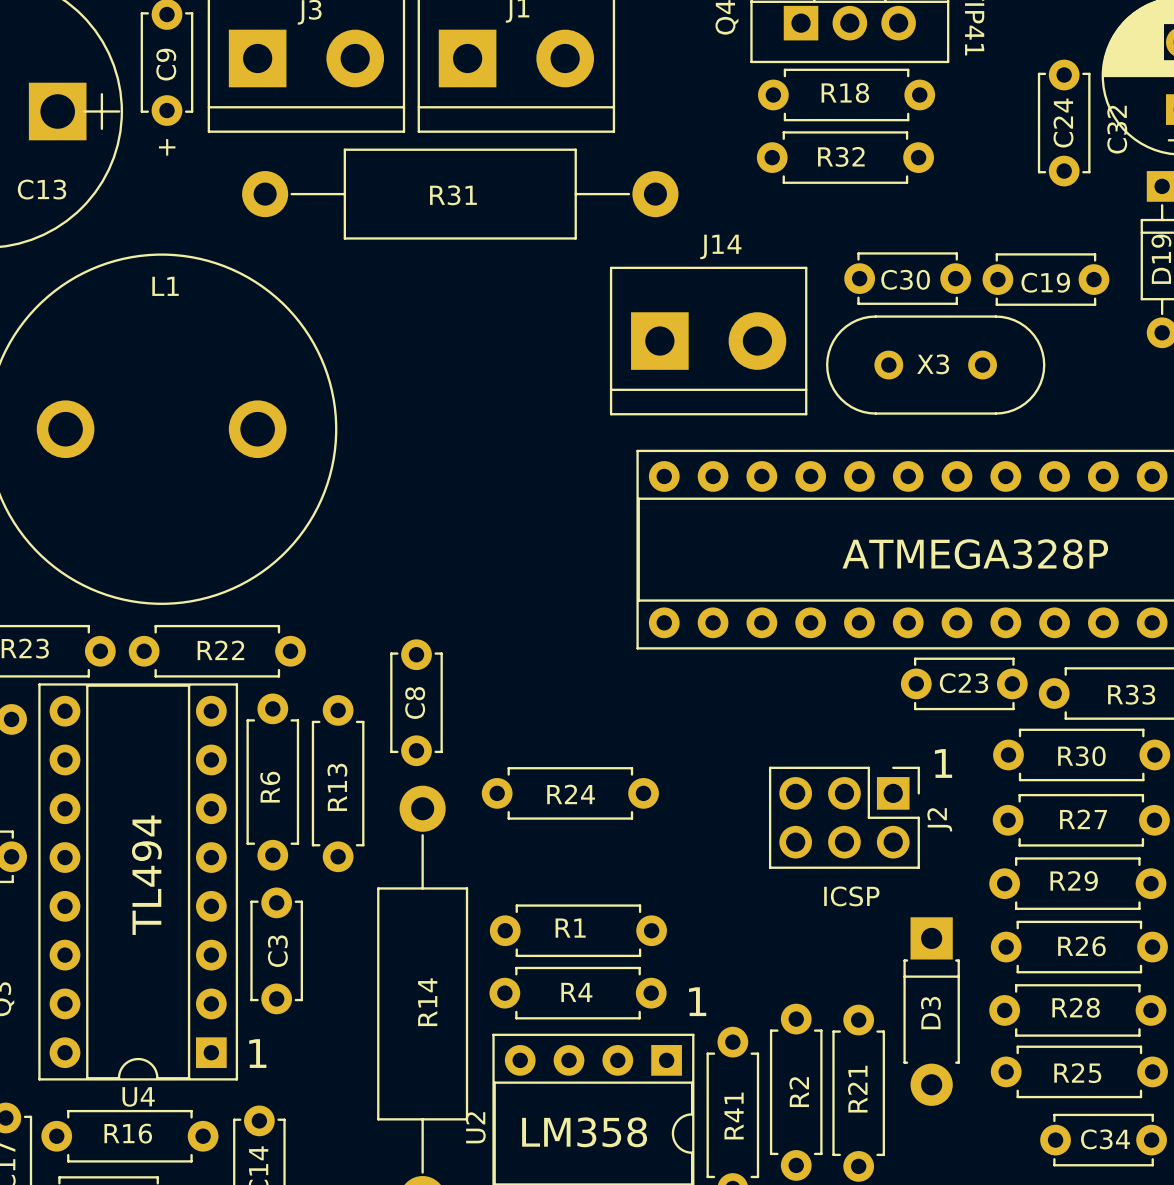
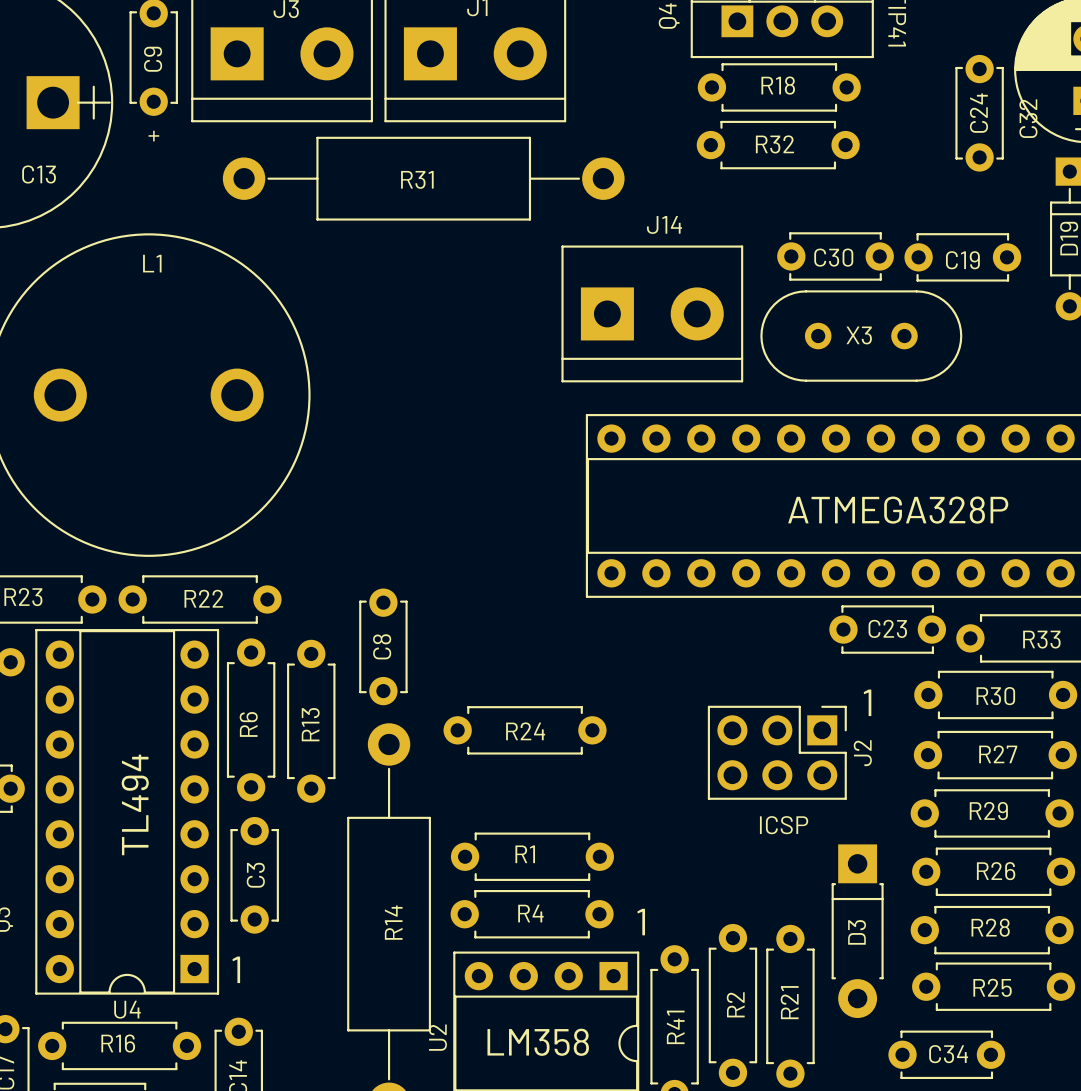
C34 position: (1103, 1140) -> (946, 1054)

